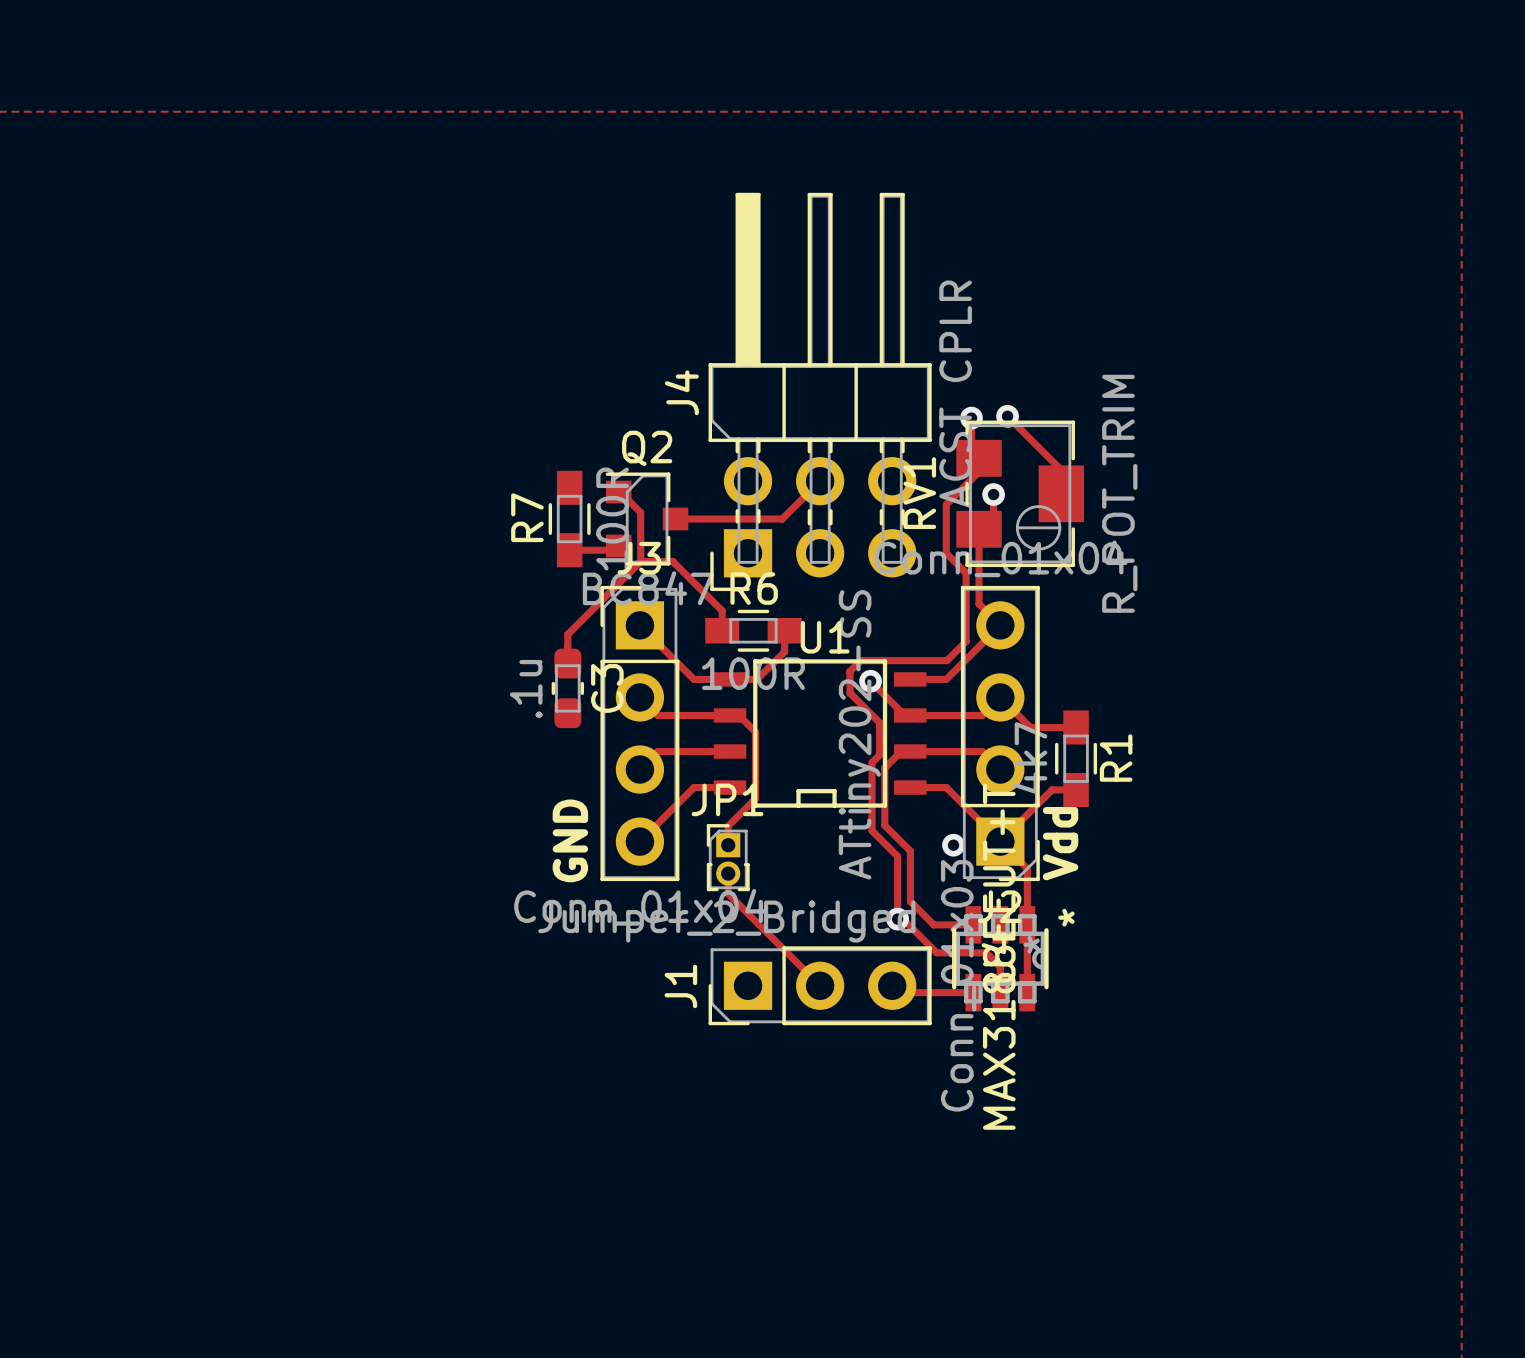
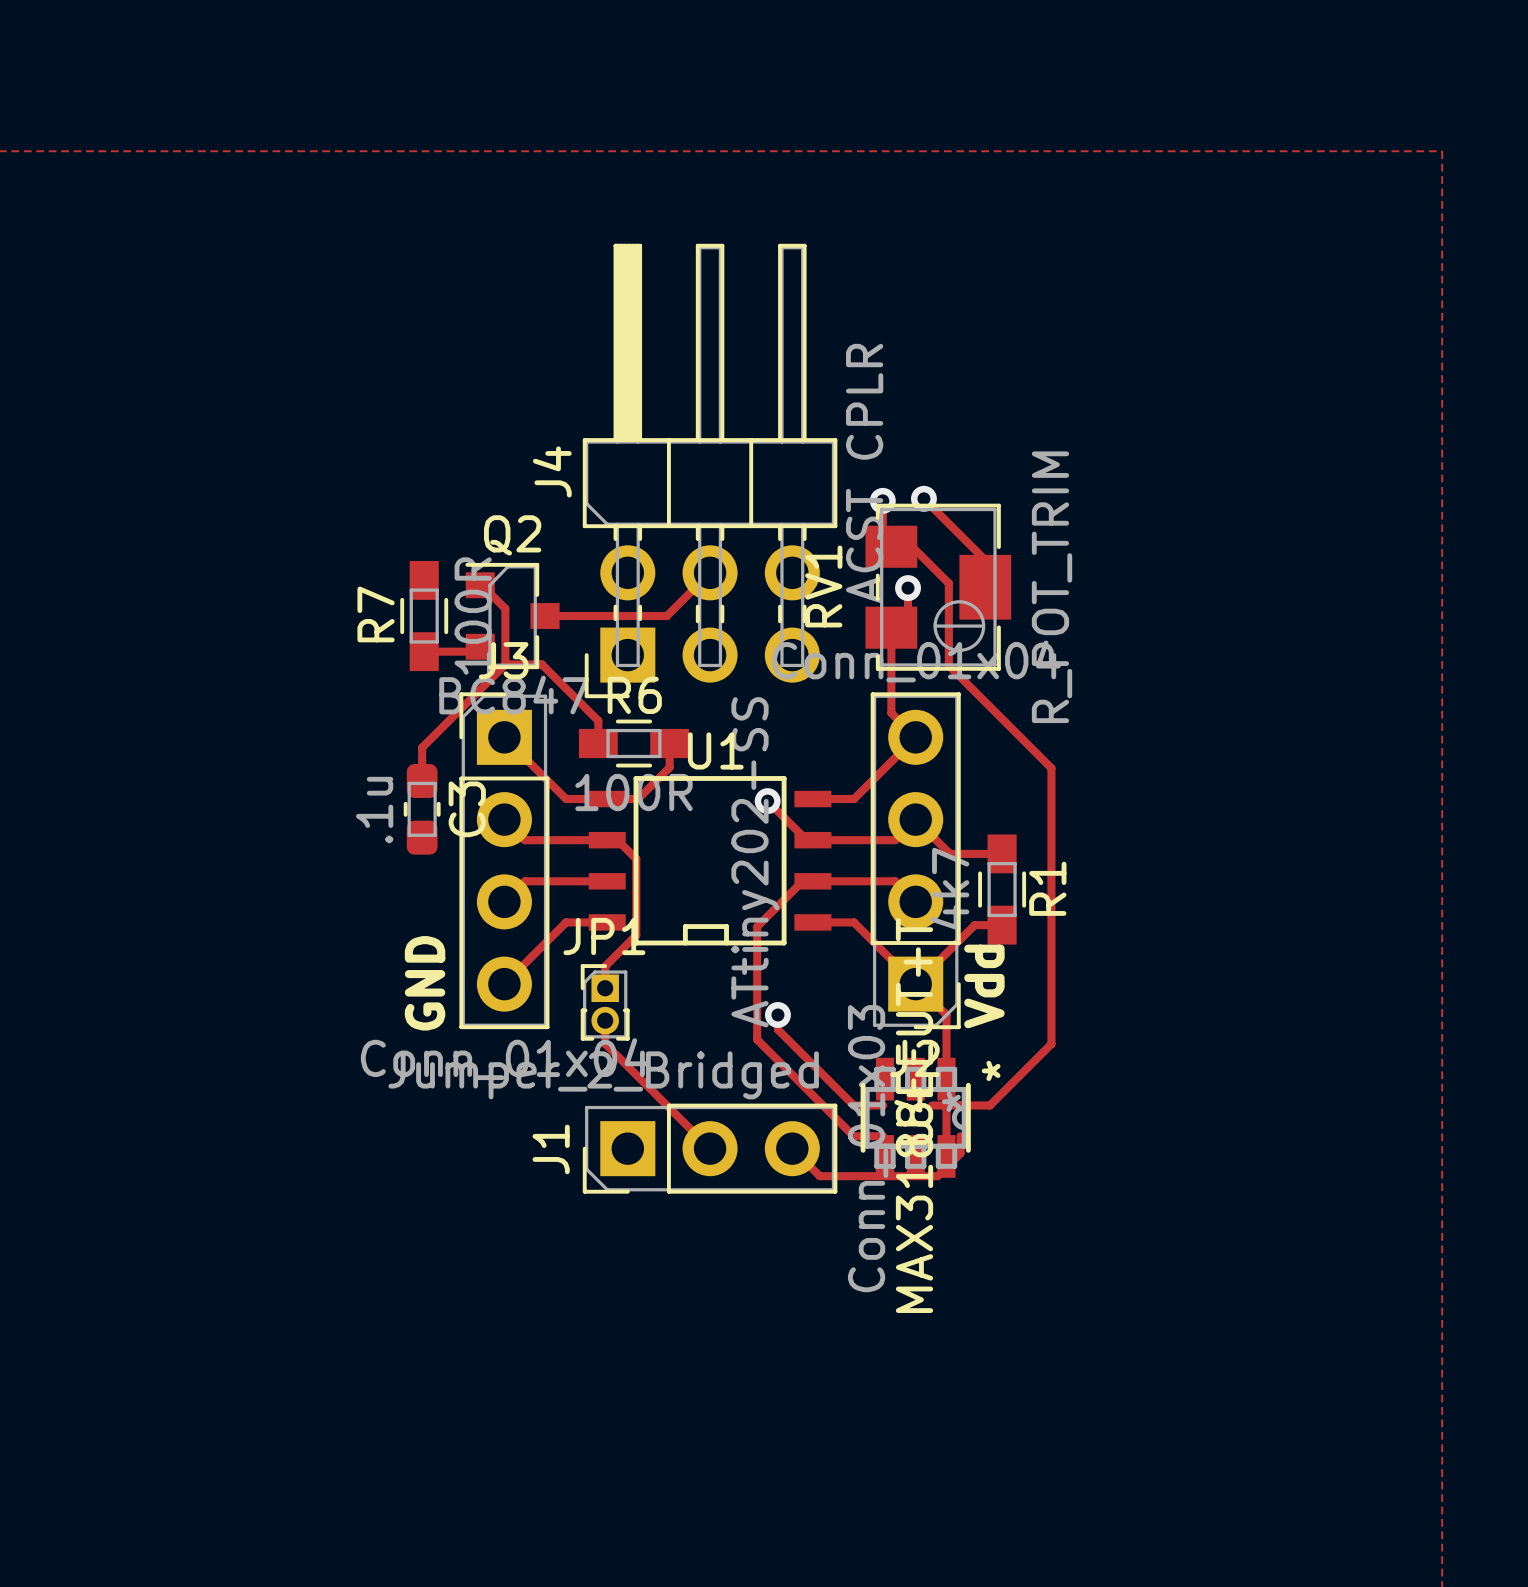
track: (979, 458) (979, 471) (946, 504) (946, 553) (966, 573) (966, 641) (947, 660) (860, 660) (850, 671) (850, 693) (879, 722) (879, 755) (872, 762) (872, 830) (897, 856) (897, 919) (903, 919) (936, 952) (986, 952) (1000, 966) (1000, 992) -> (891, 546) (912, 546) (948, 583) (948, 665) (1051, 768) (1051, 1044) (990, 1105) (932, 1105)
track: (884, 767) (884, 825) (910, 851) (910, 901) (933, 924) (973, 924) (973, 914) -> (783, 900) (757, 926) (757, 1039) (853, 1136) (883, 1136)
via: (953, 845) -> none
track: none -> (777, 1014) (777, 1029) (853, 1105) (883, 1105)
via: none -> (777, 1014)
via: (897, 919) -> none
track: (899, 992) (973, 992) -> (800, 1156) (819, 1176) (937, 1176) (960, 1153) (960, 1136)

